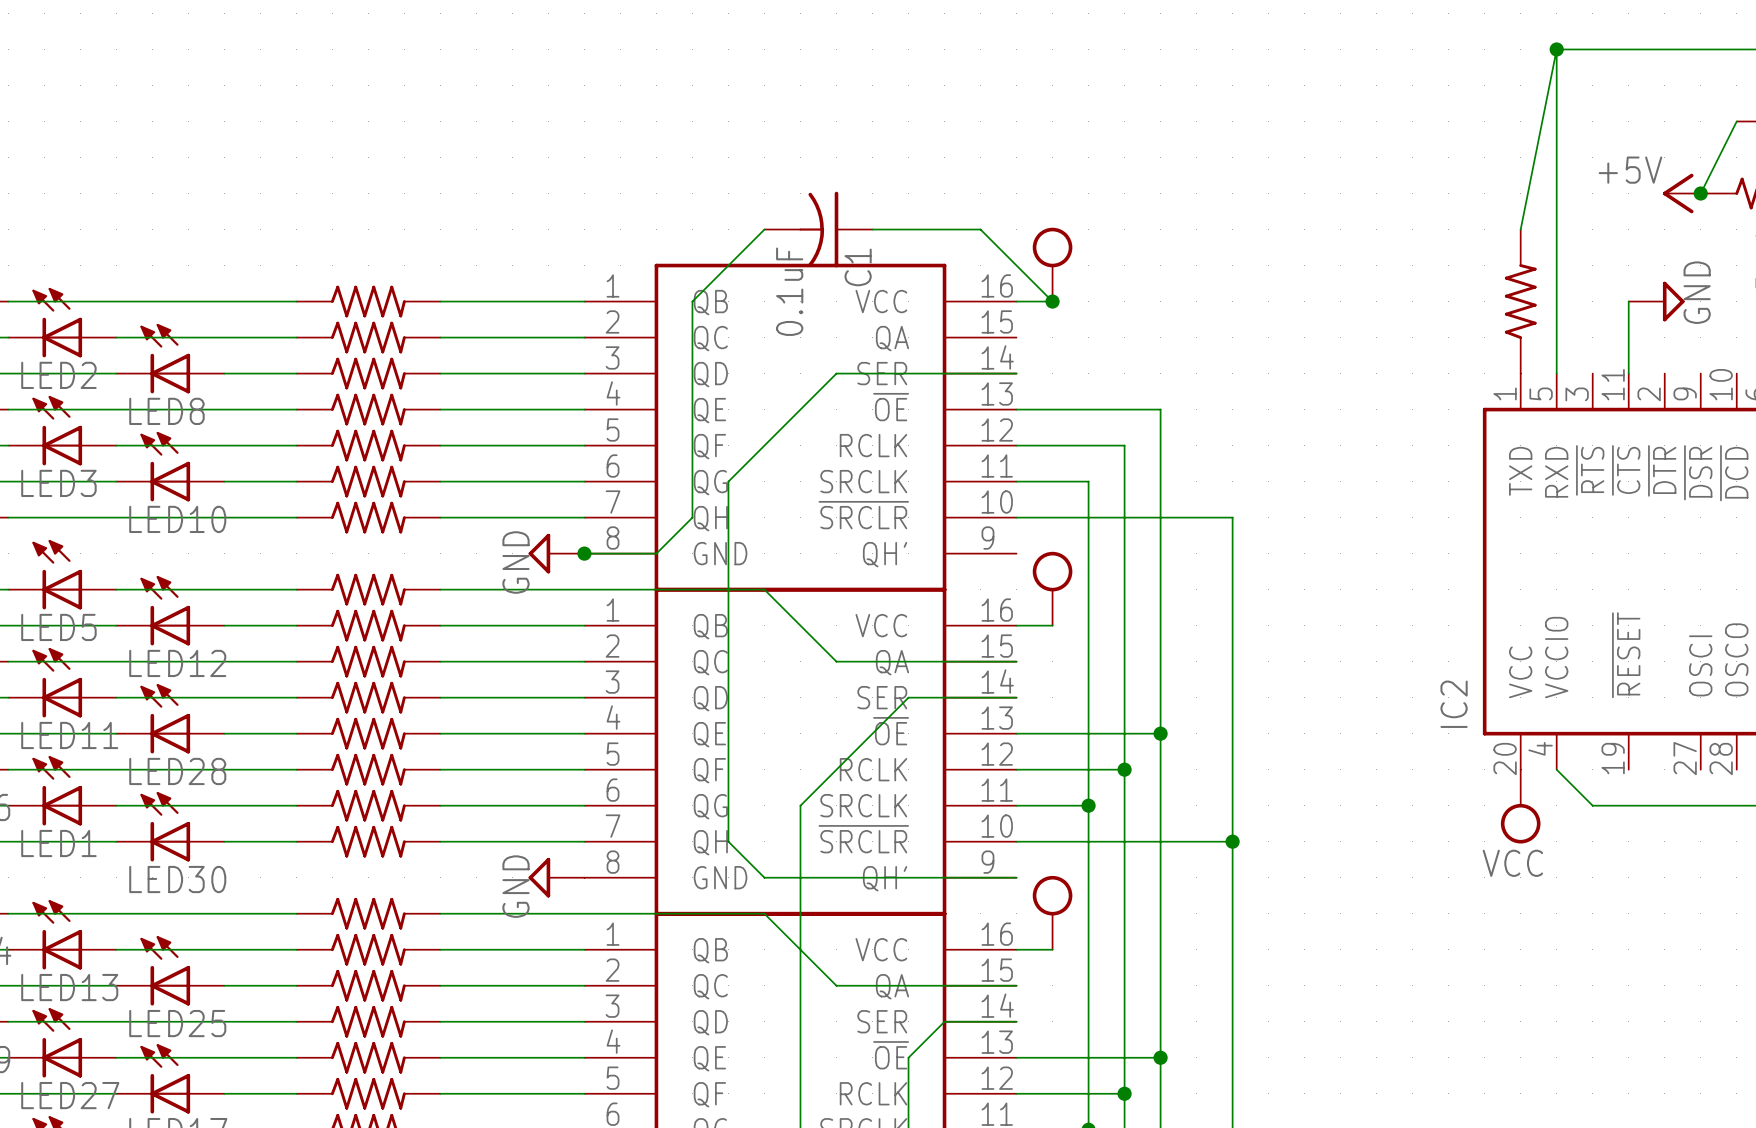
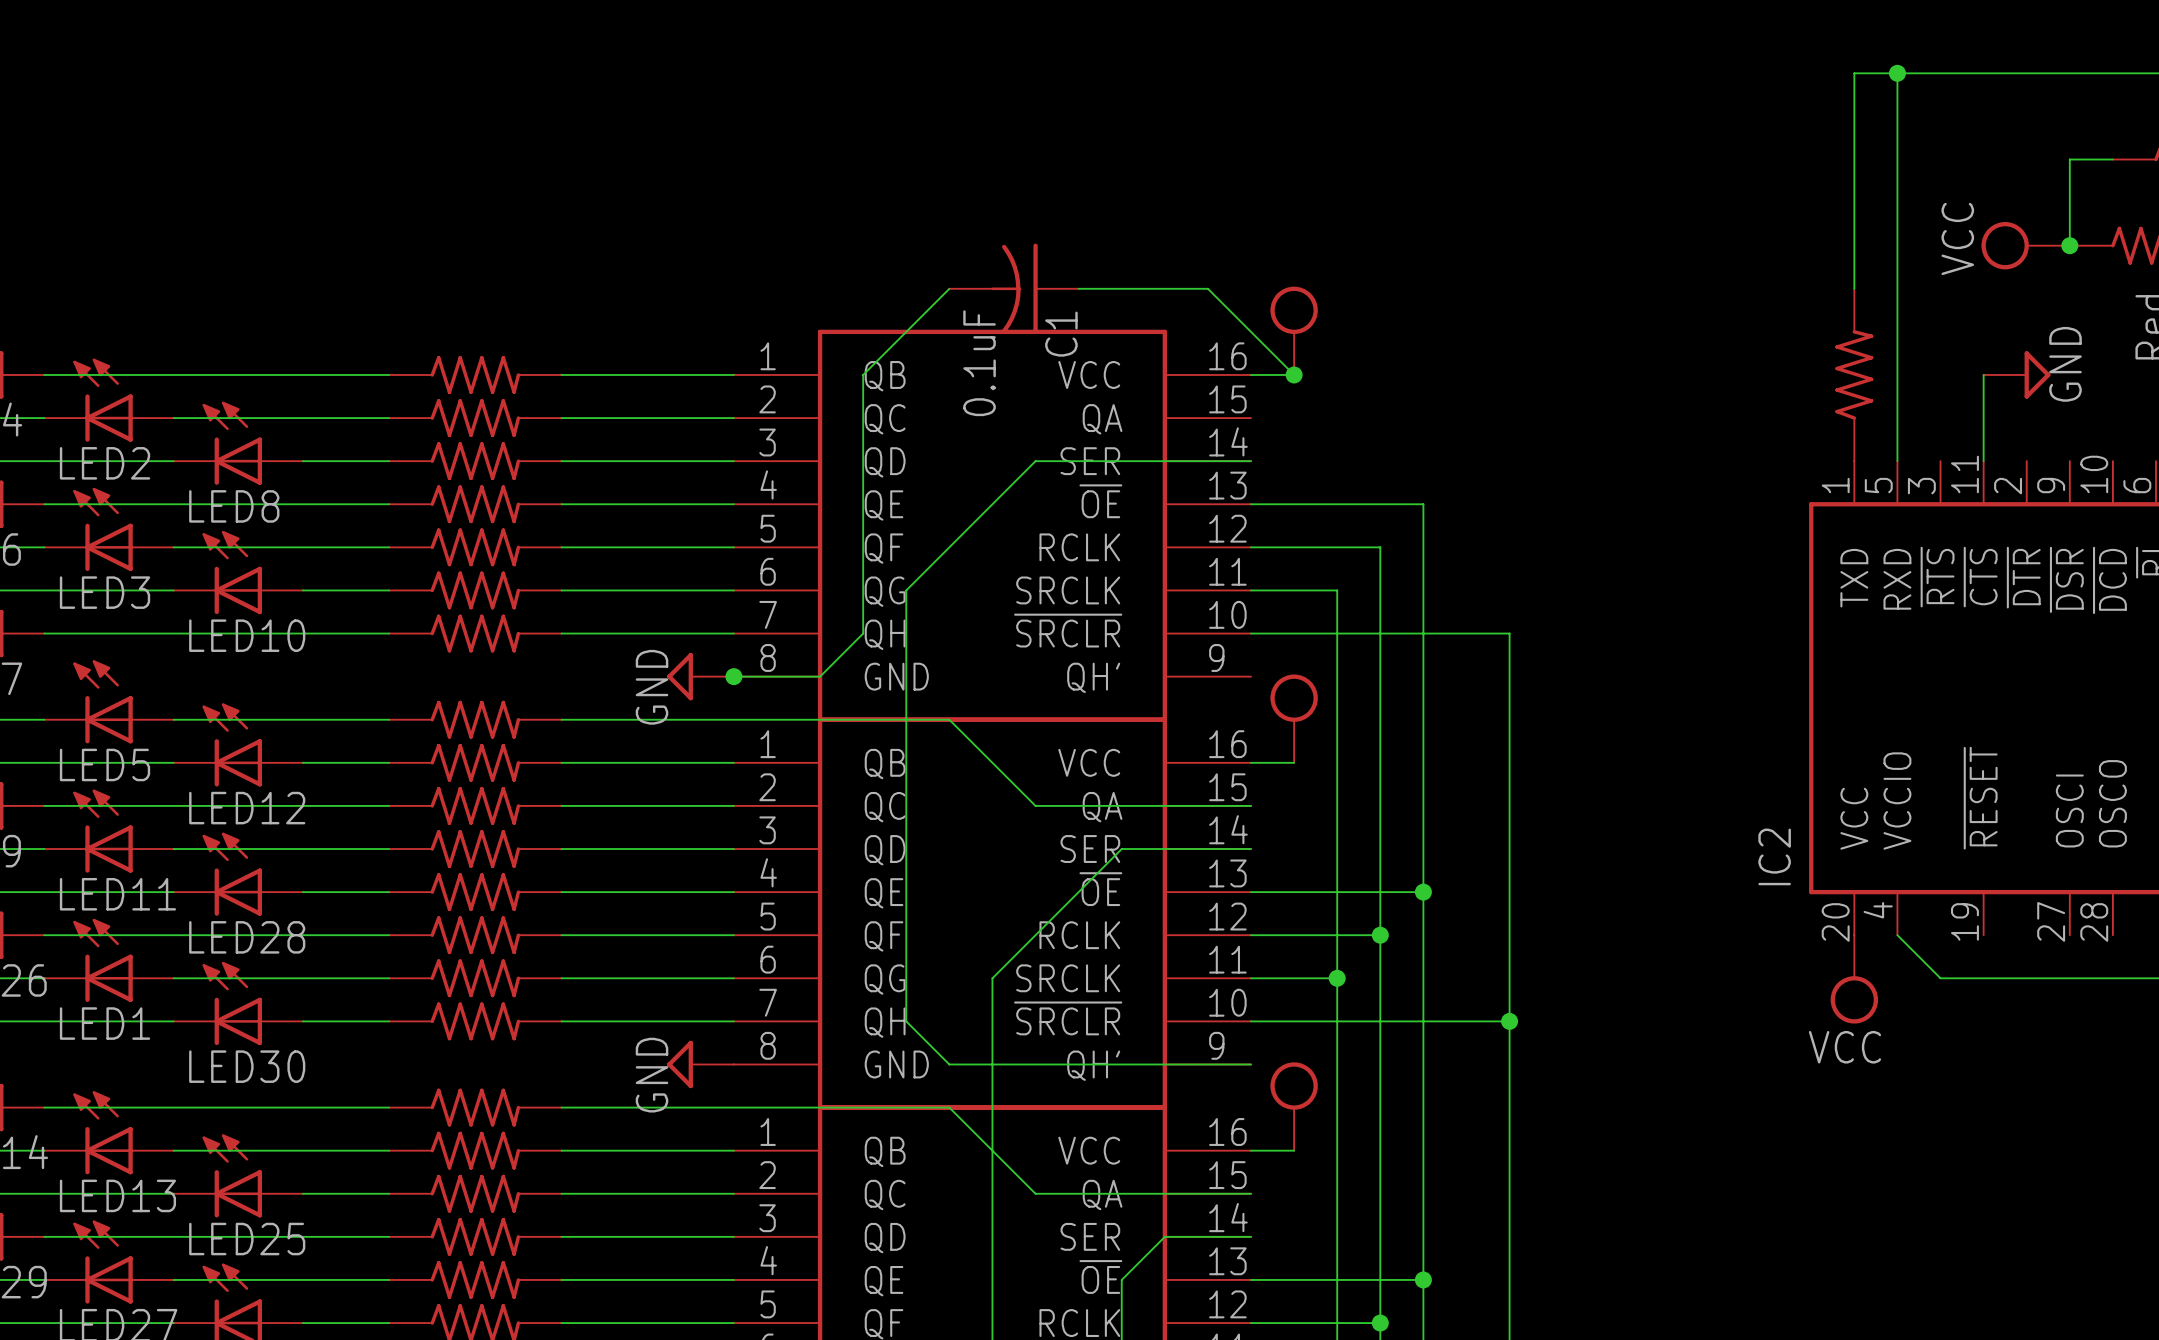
wire: (1556, 49) (1520, 229) -> (1897, 73) (1854, 73) (1854, 288)
wire: (1736, 121) (1700, 193) -> (2112, 159) (2069, 159) (2069, 245)
power symbol: none -> VCC (2025, 245)
power symbol: +5V (1681, 193) -> none

